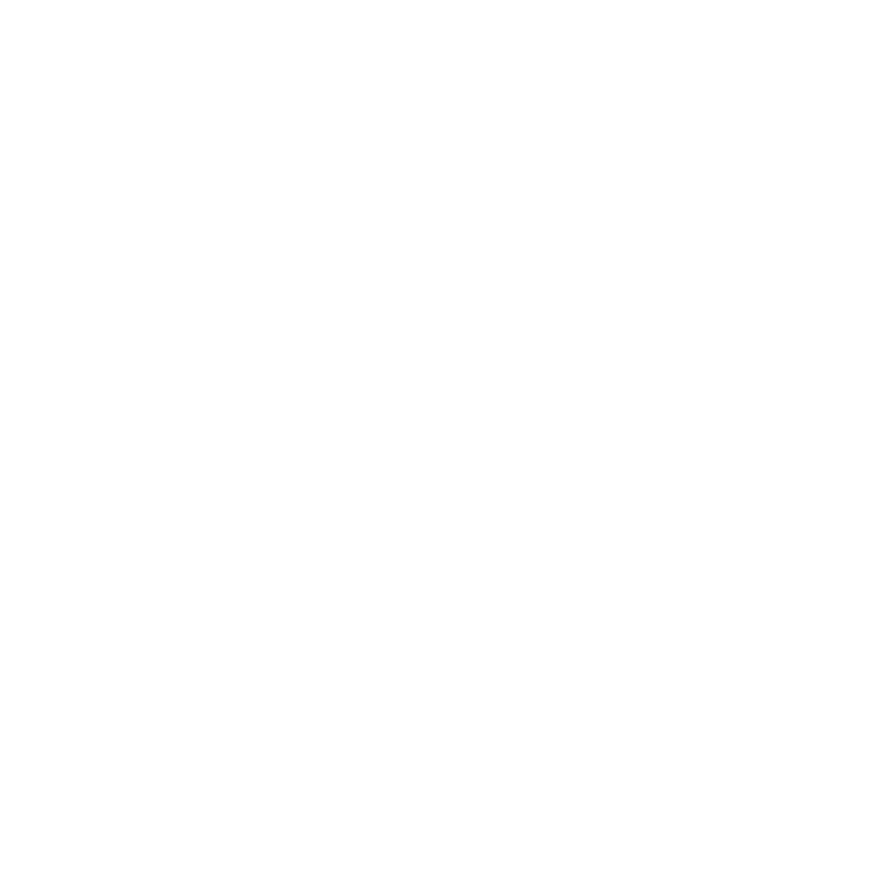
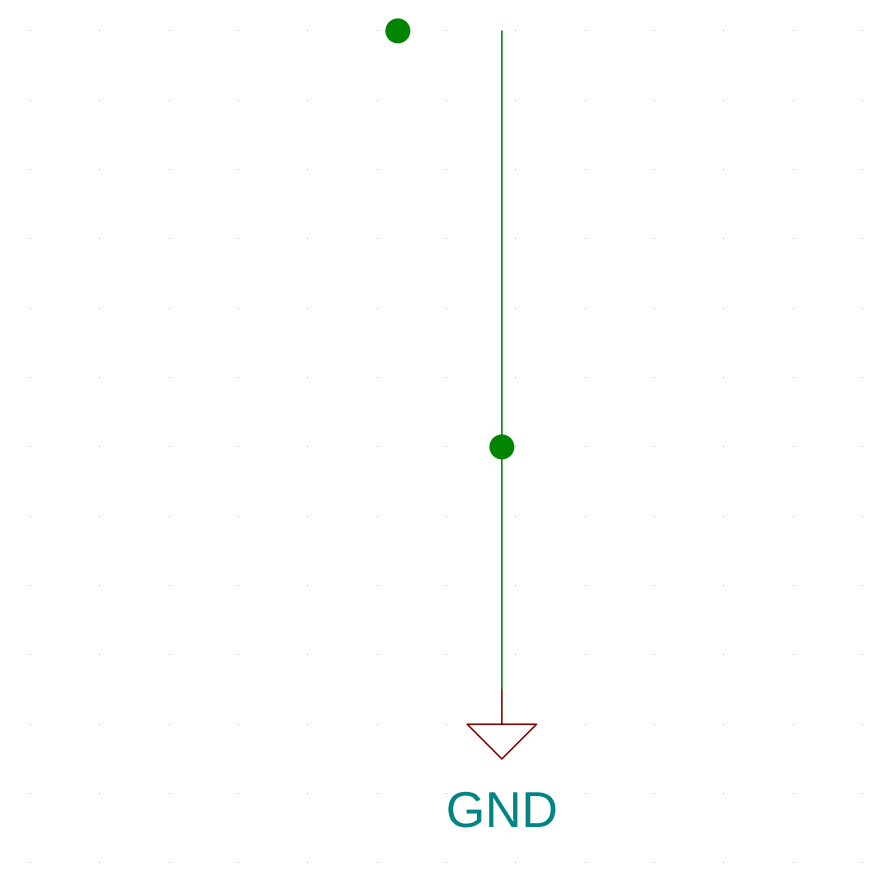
junction: none -> (397, 30)
wire: none -> (501, 30) (501, 689)
junction: none -> (501, 446)
power symbol: none -> GND (501, 724)

